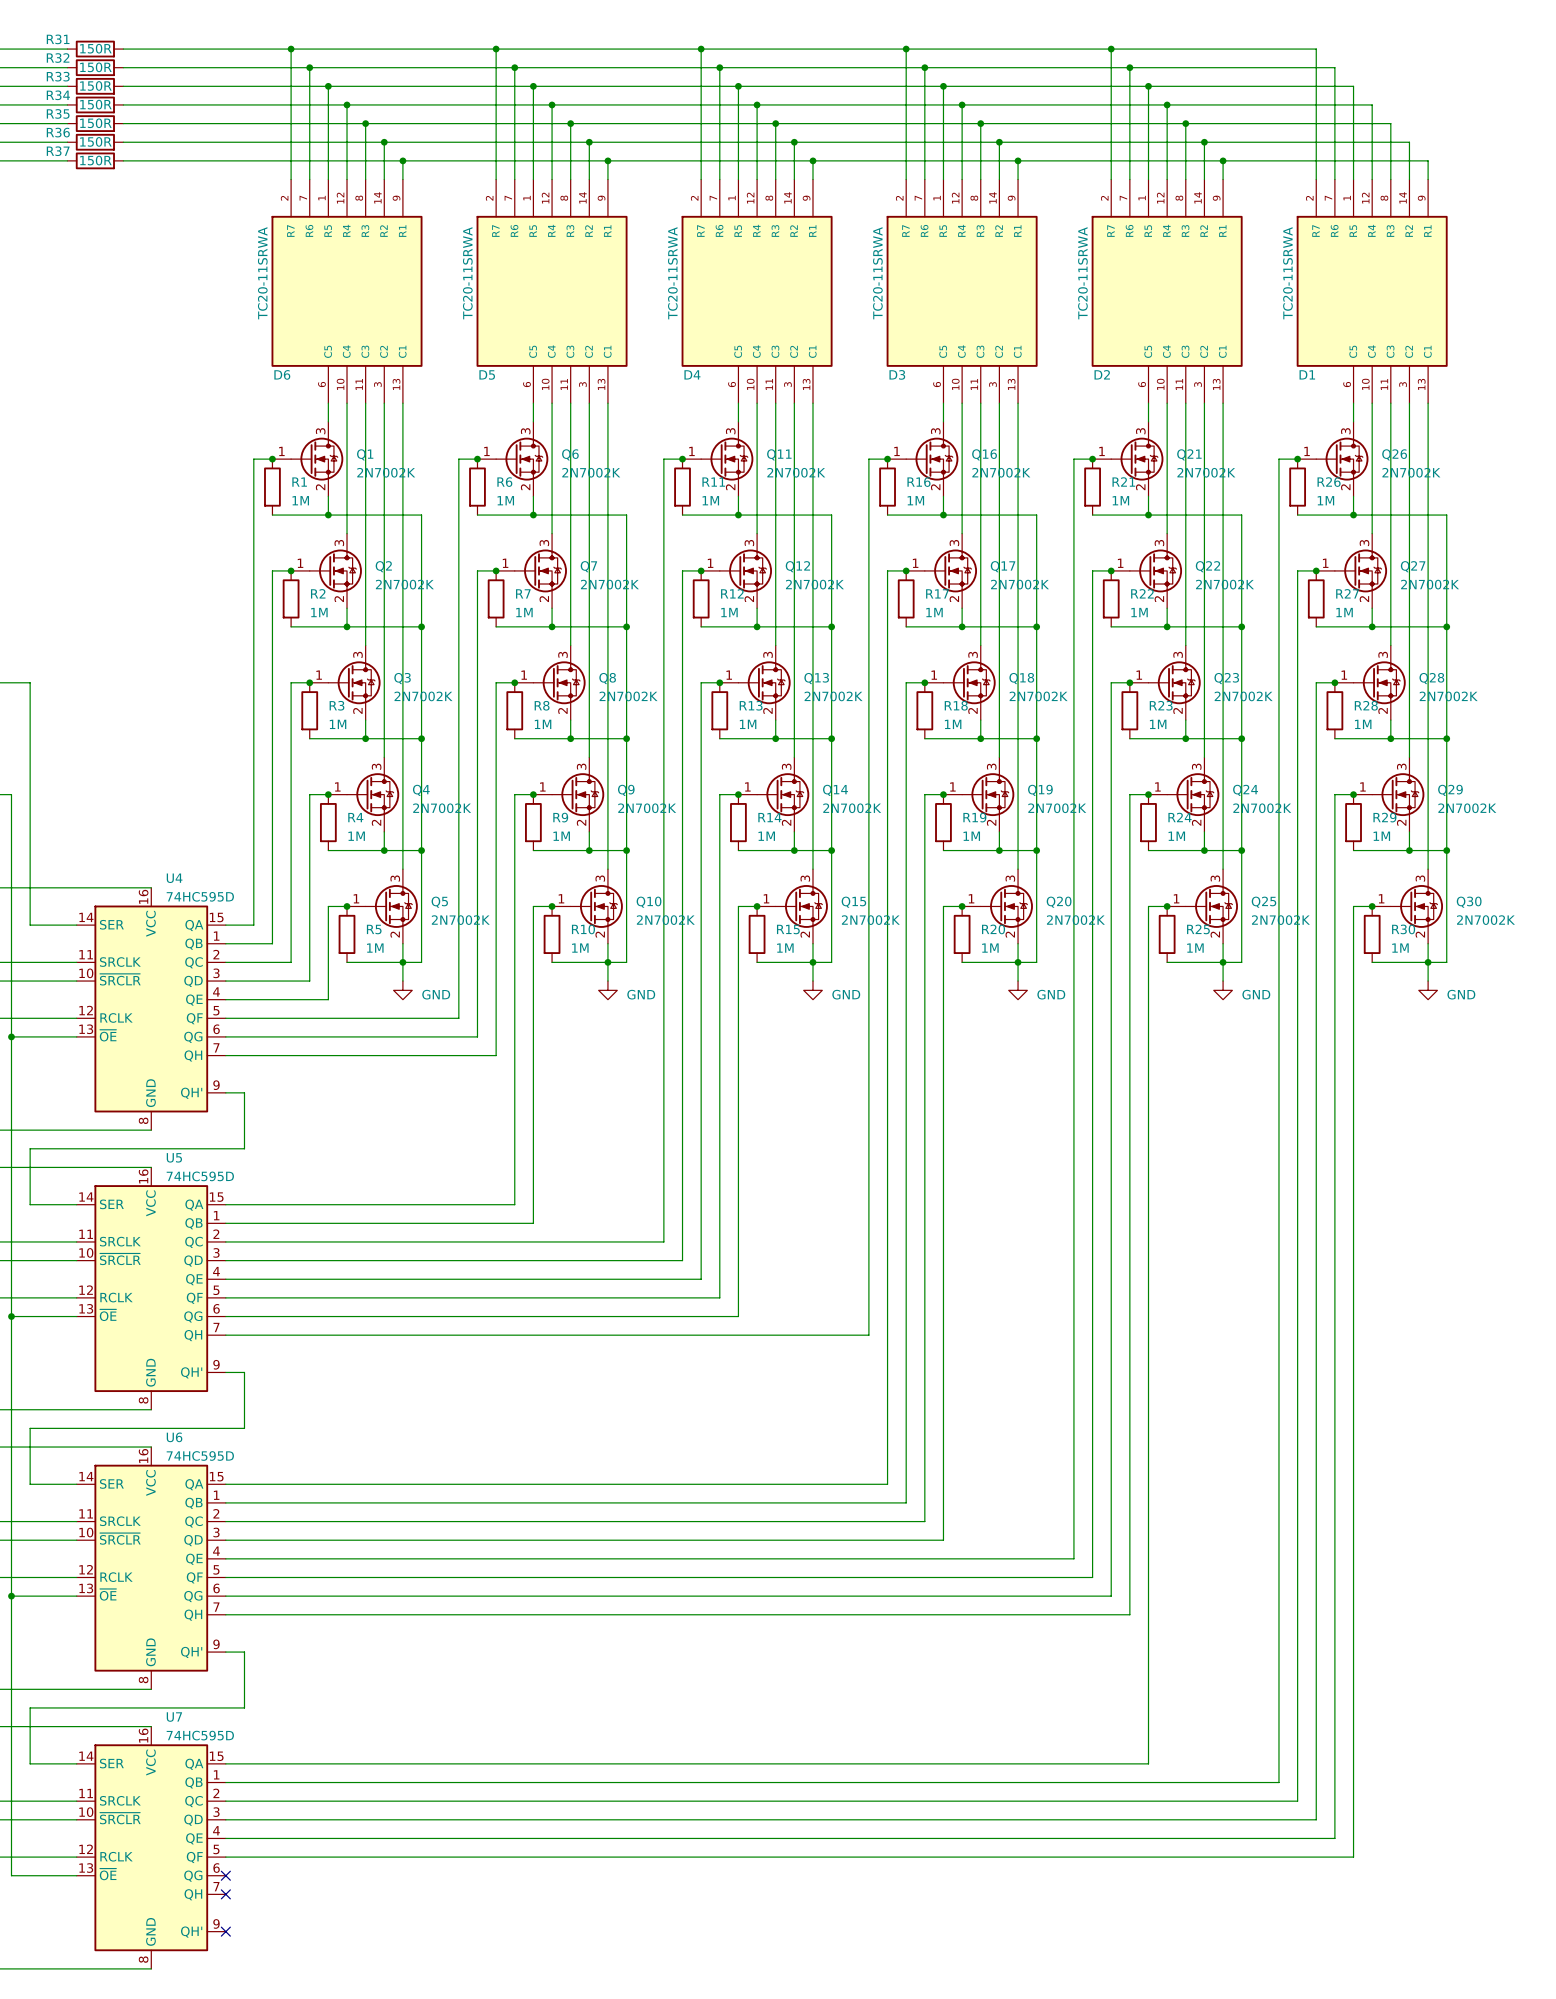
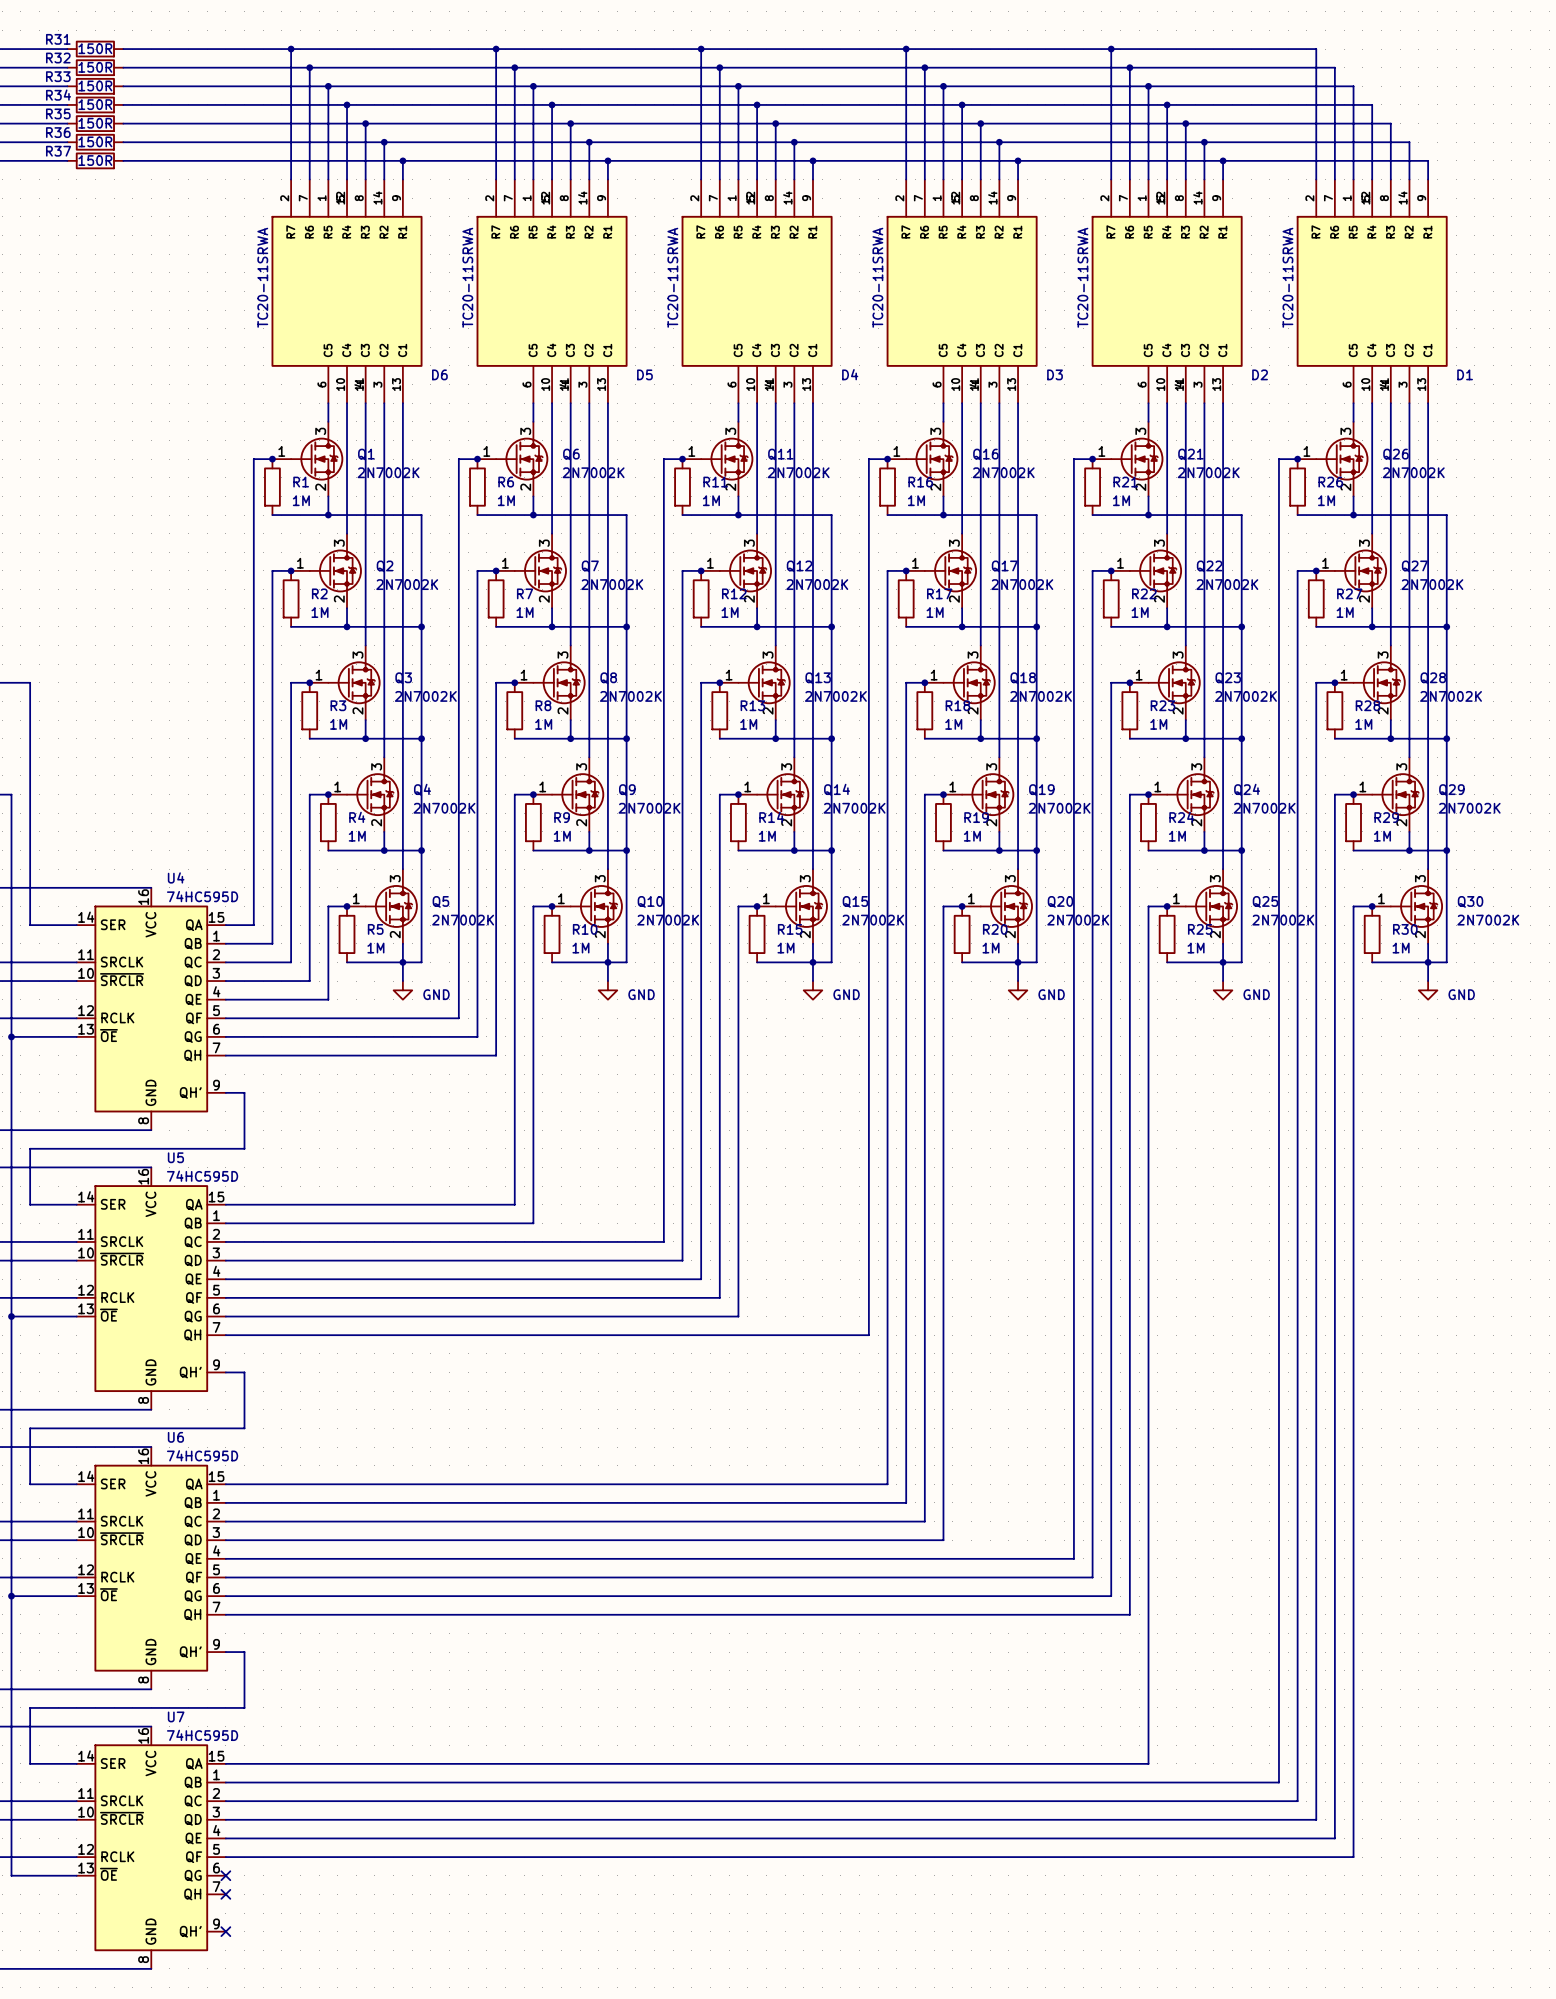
D6 symbol: [271, 179, 423, 404] -> [271, 179, 423, 404]
D5 symbol: [476, 179, 628, 404] -> [476, 179, 628, 404]
D4 symbol: [681, 179, 833, 404] -> [681, 179, 833, 404]
D3 symbol: [886, 179, 1038, 404] -> [886, 179, 1038, 404]
D2 symbol: [1091, 179, 1243, 404] -> [1091, 179, 1243, 404]
D1 symbol: [1296, 179, 1448, 404] -> [1296, 179, 1448, 404]
D6 name position: D6 (282, 374) -> D6 (439, 374)
D5 name position: D5 (487, 374) -> D5 (644, 374)
D4 name position: D4 (692, 374) -> D4 (850, 374)
D3 name position: D3 (897, 374) -> D3 (1055, 374)
D2 name position: D2 (1102, 374) -> D2 (1260, 374)
D1 name position: D1 (1307, 374) -> D1 (1465, 374)

